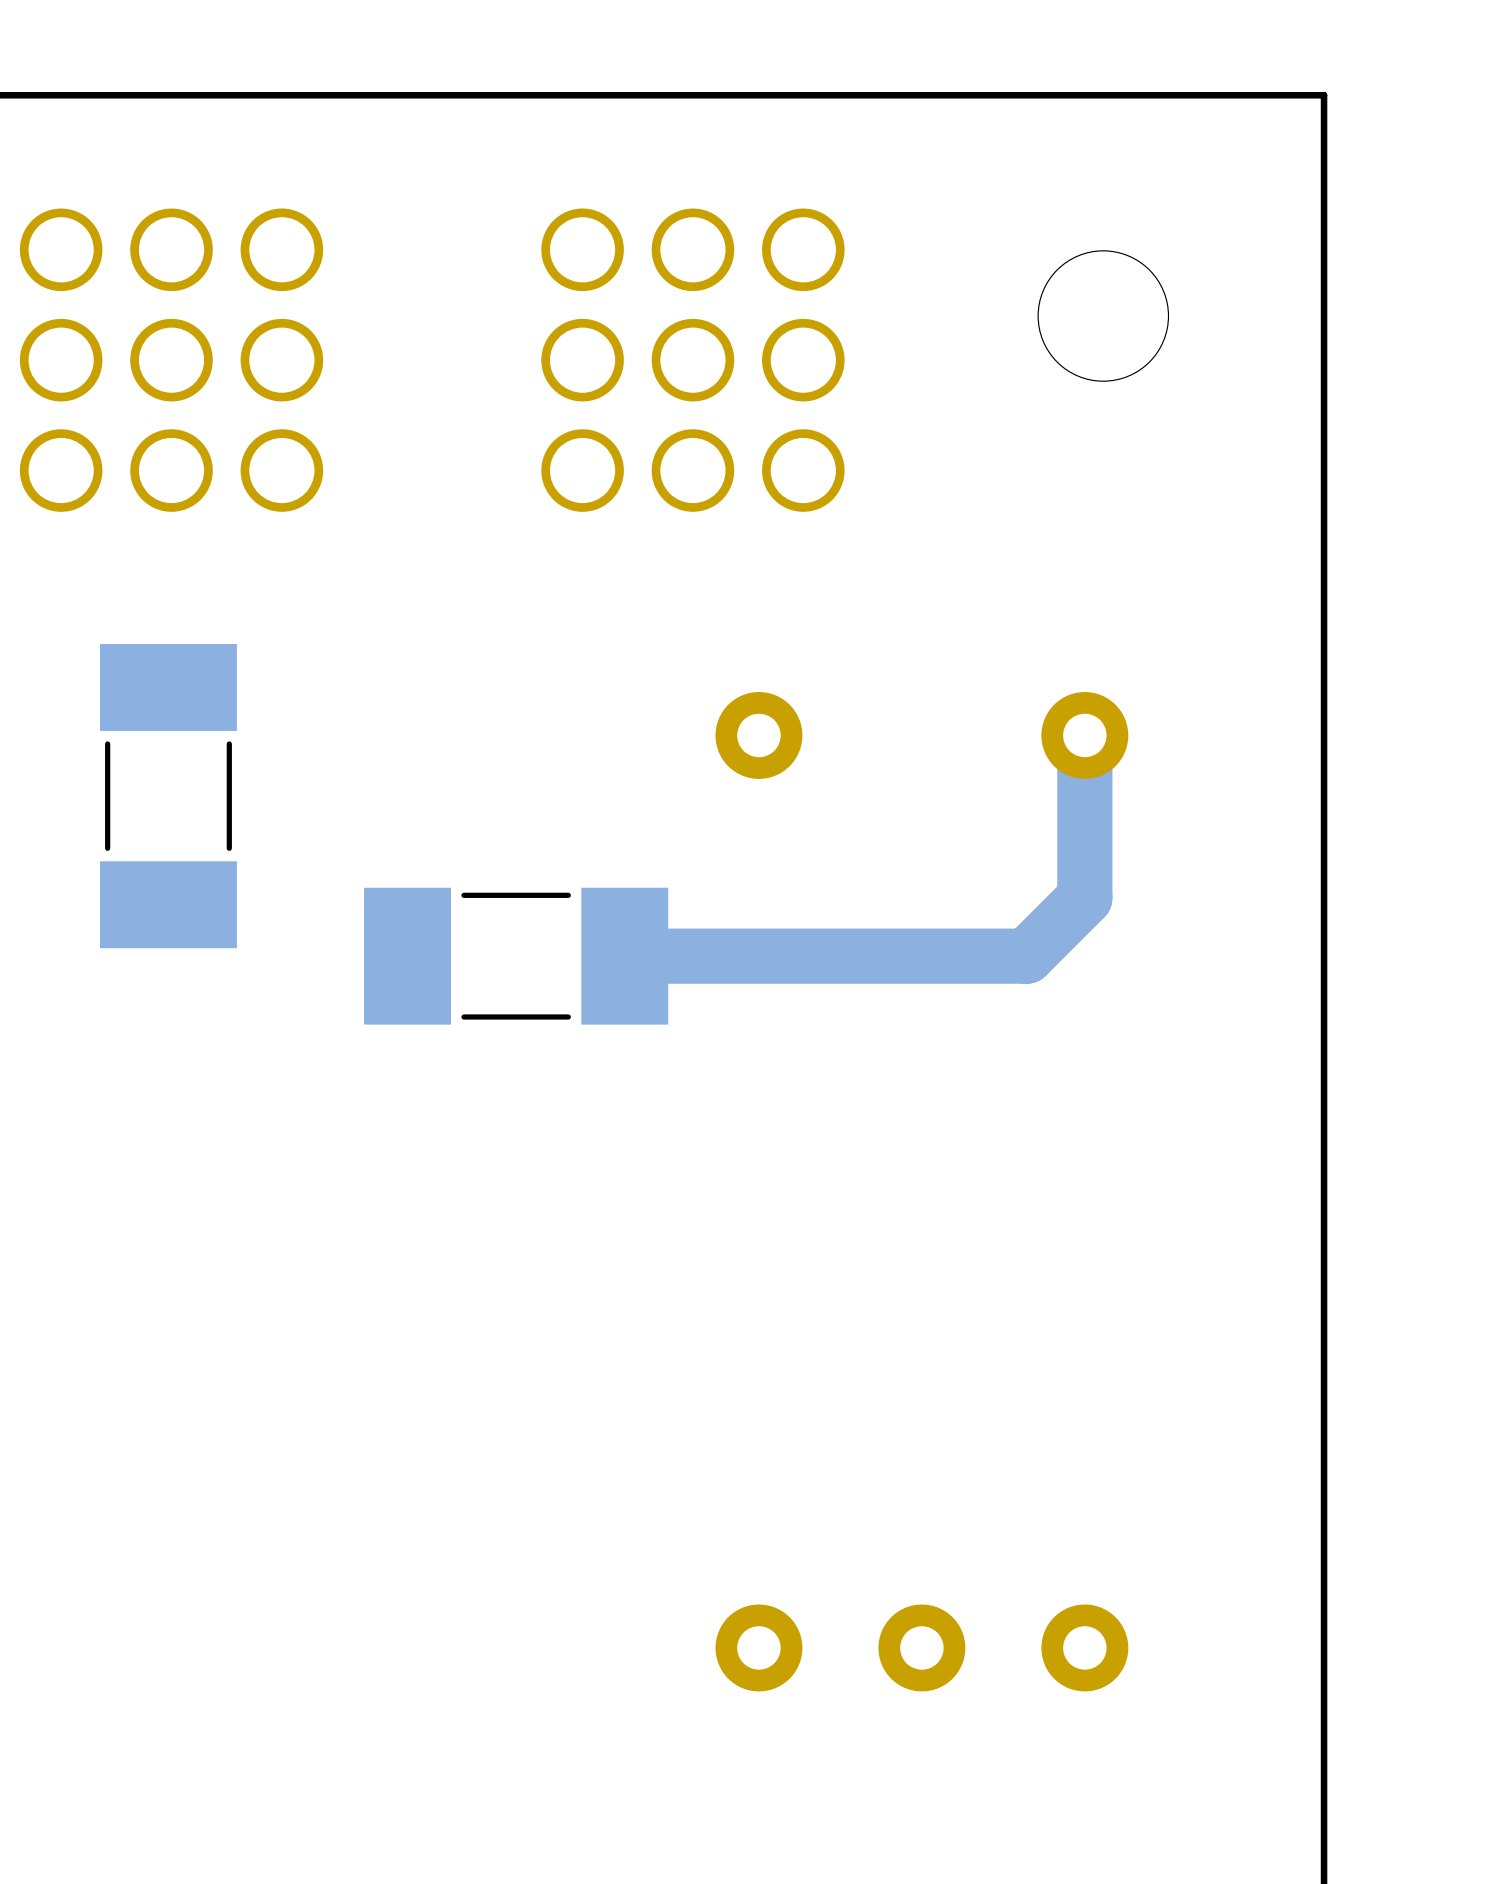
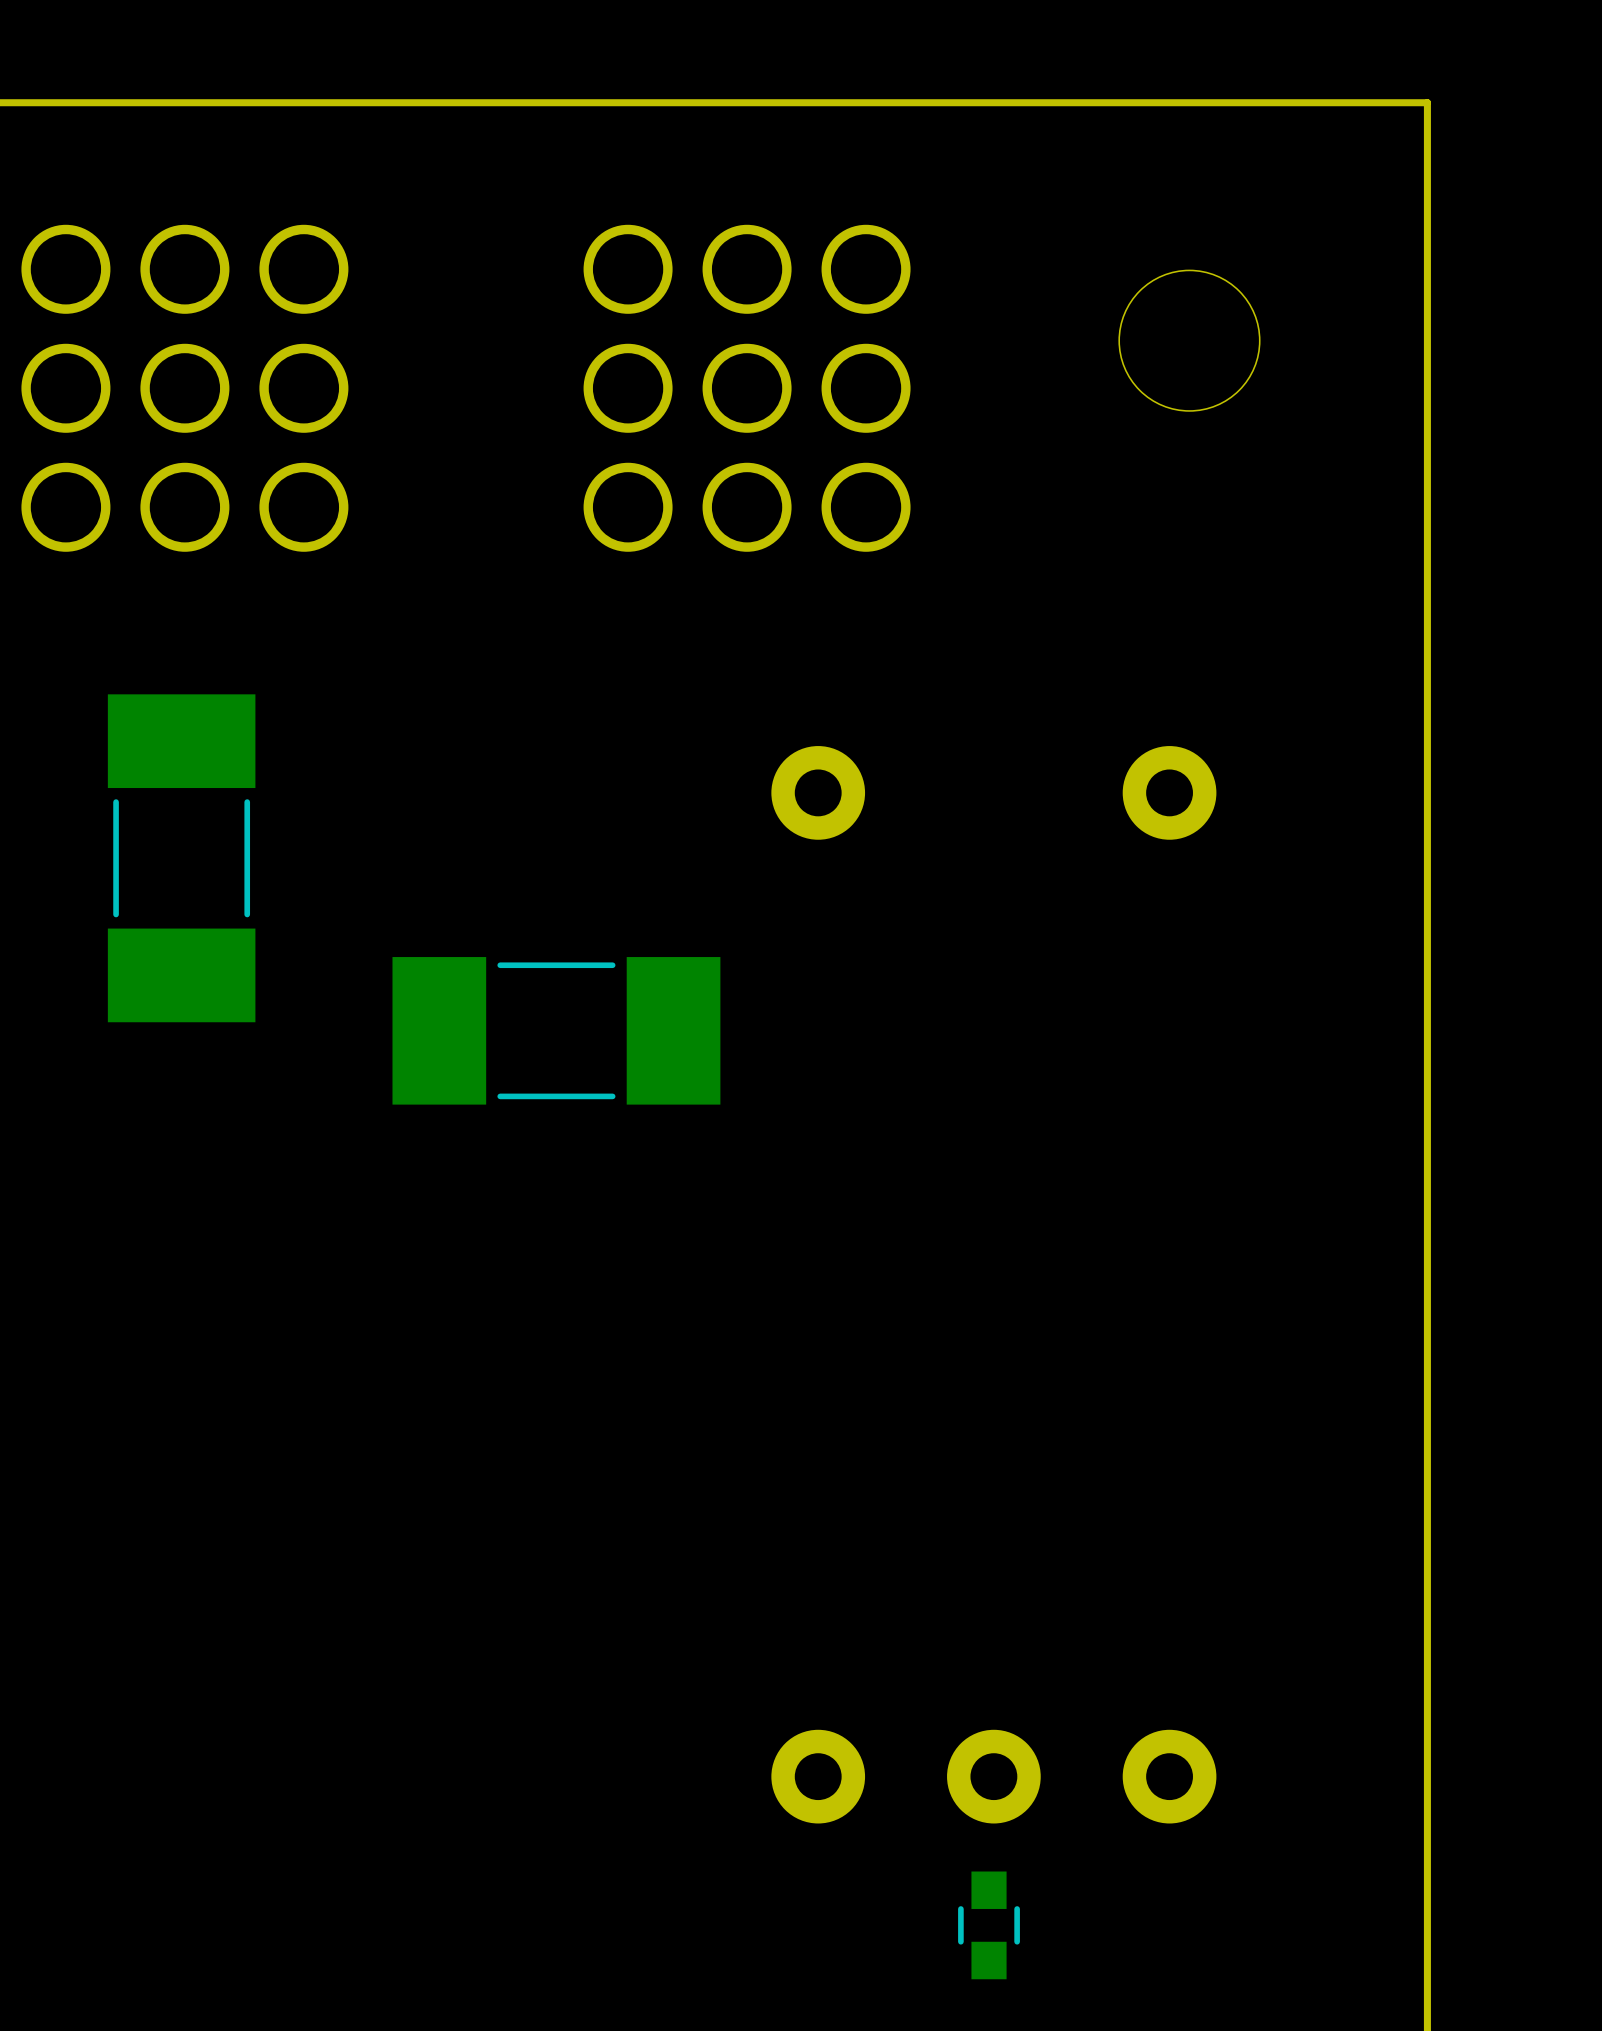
track: (1084, 735) (1084, 897) (1026, 956) (624, 956) -> none
part: none -> (989, 1925)

